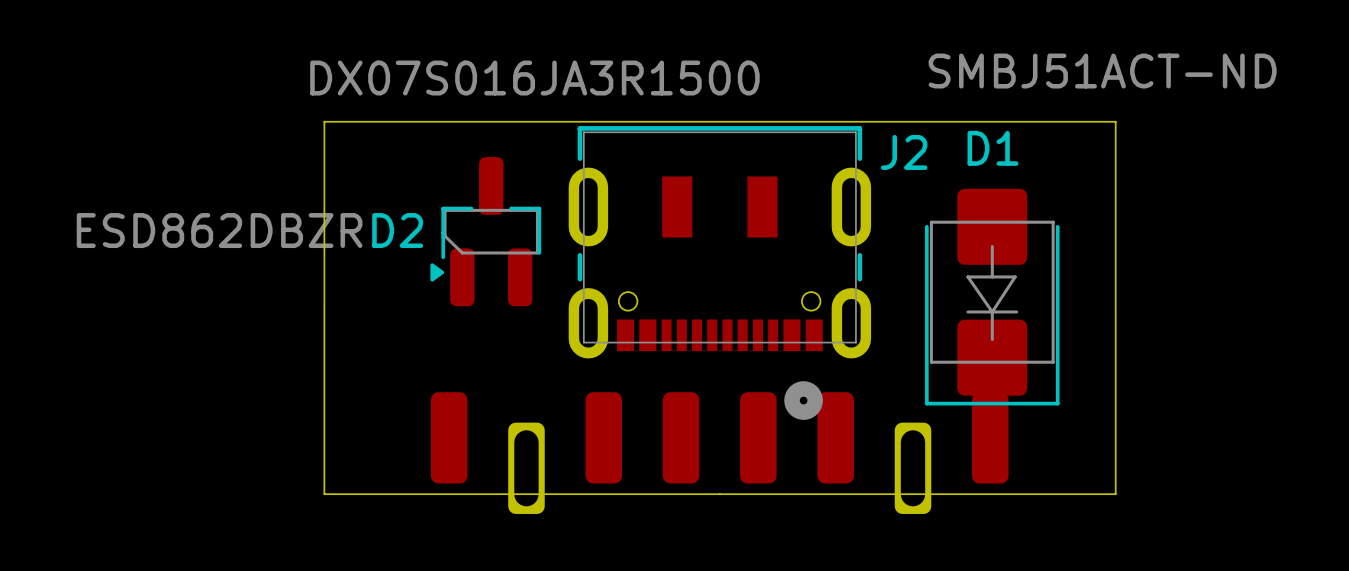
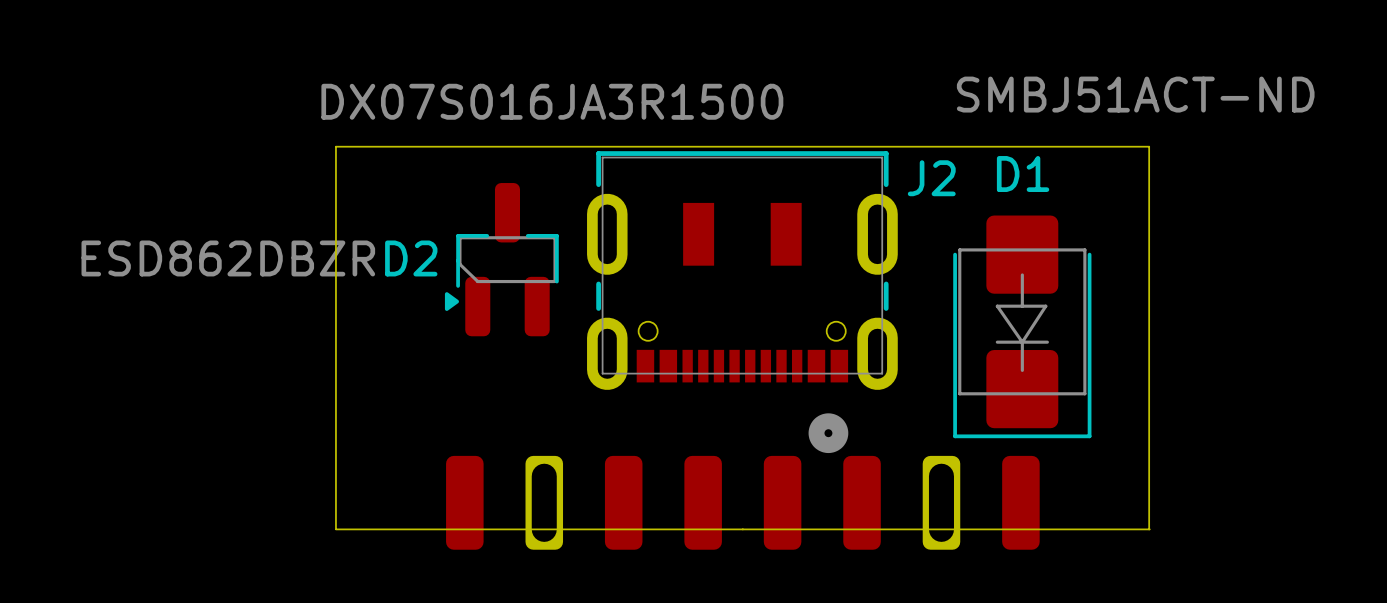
part footprint: [323, 392, 1117, 514] -> [335, 455, 1151, 550]

